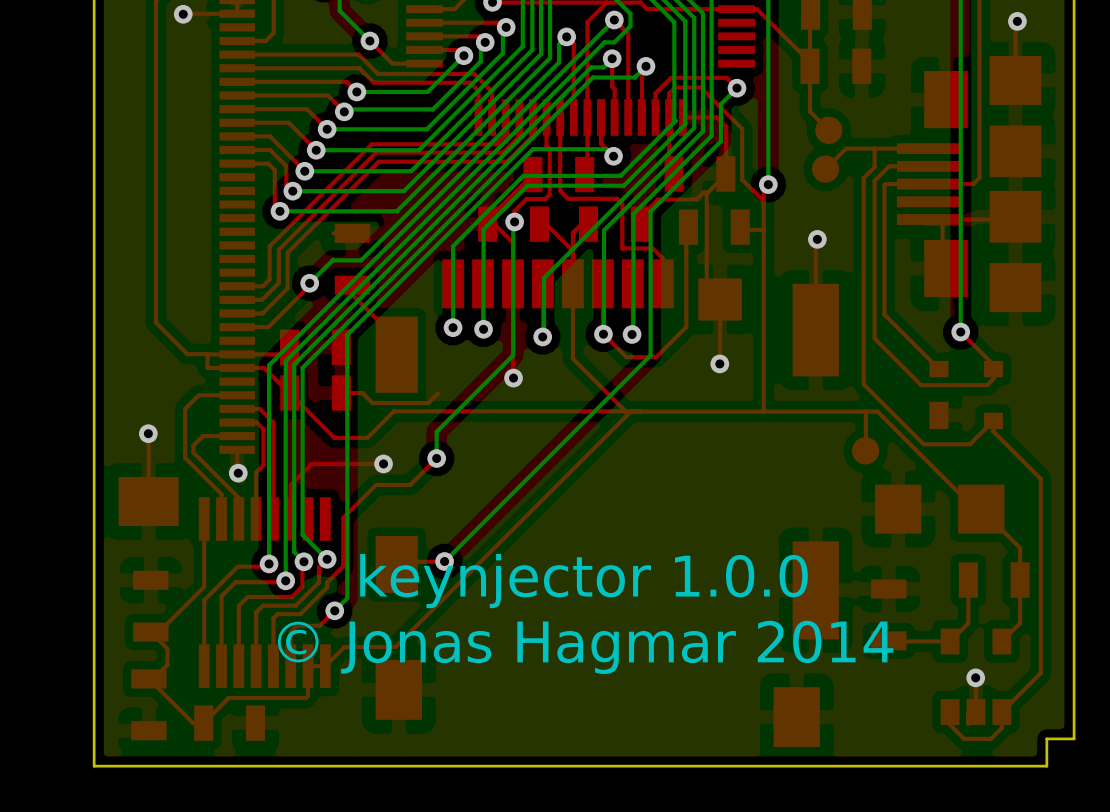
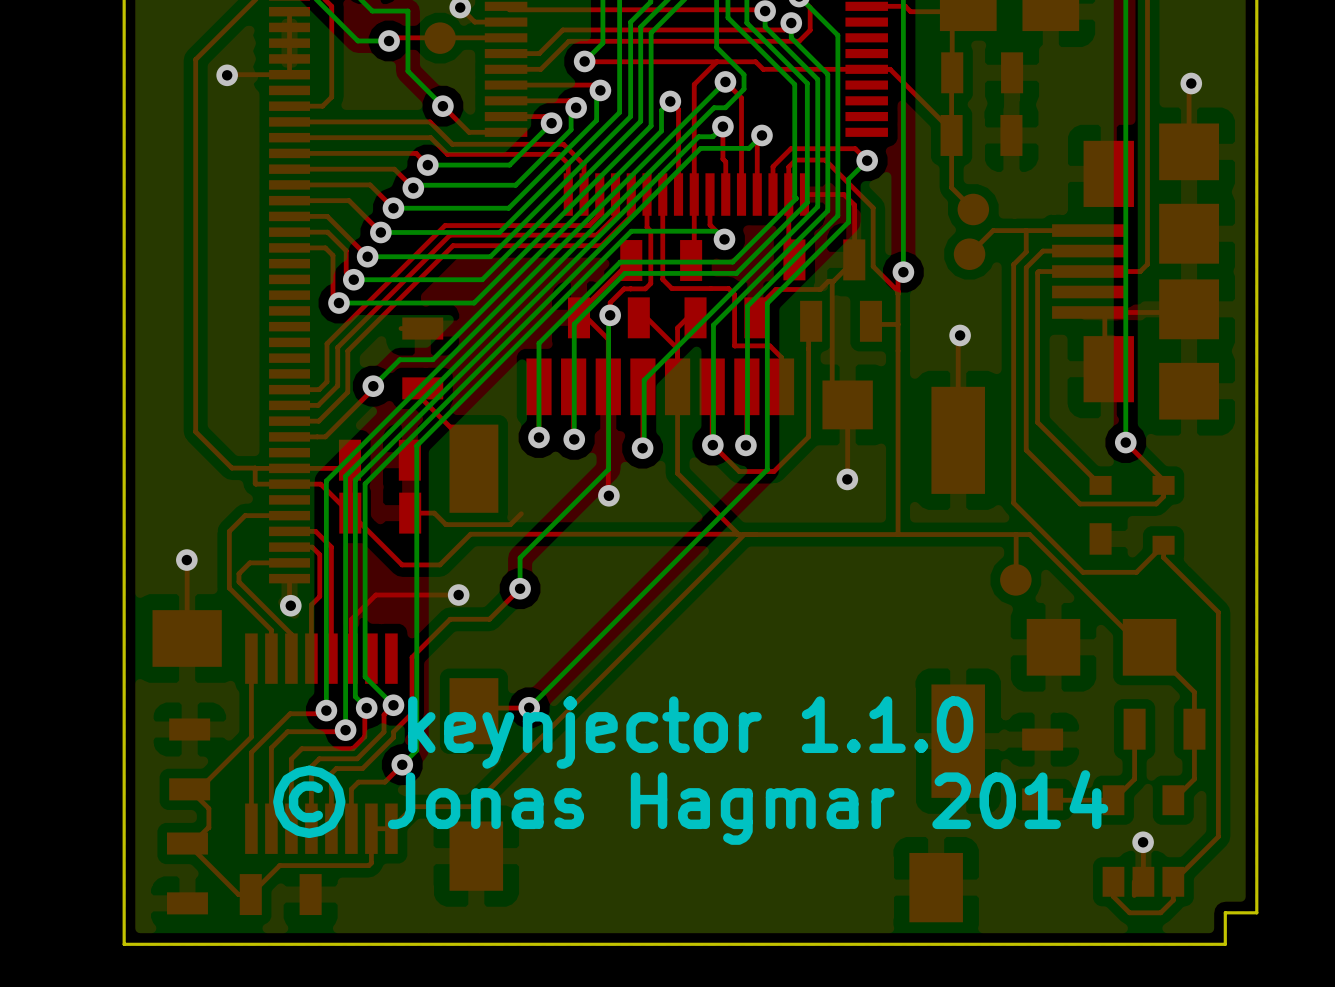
text: keynjector 1.0.0 (583, 581) -> keynjector 1.1.0 (690, 732)

